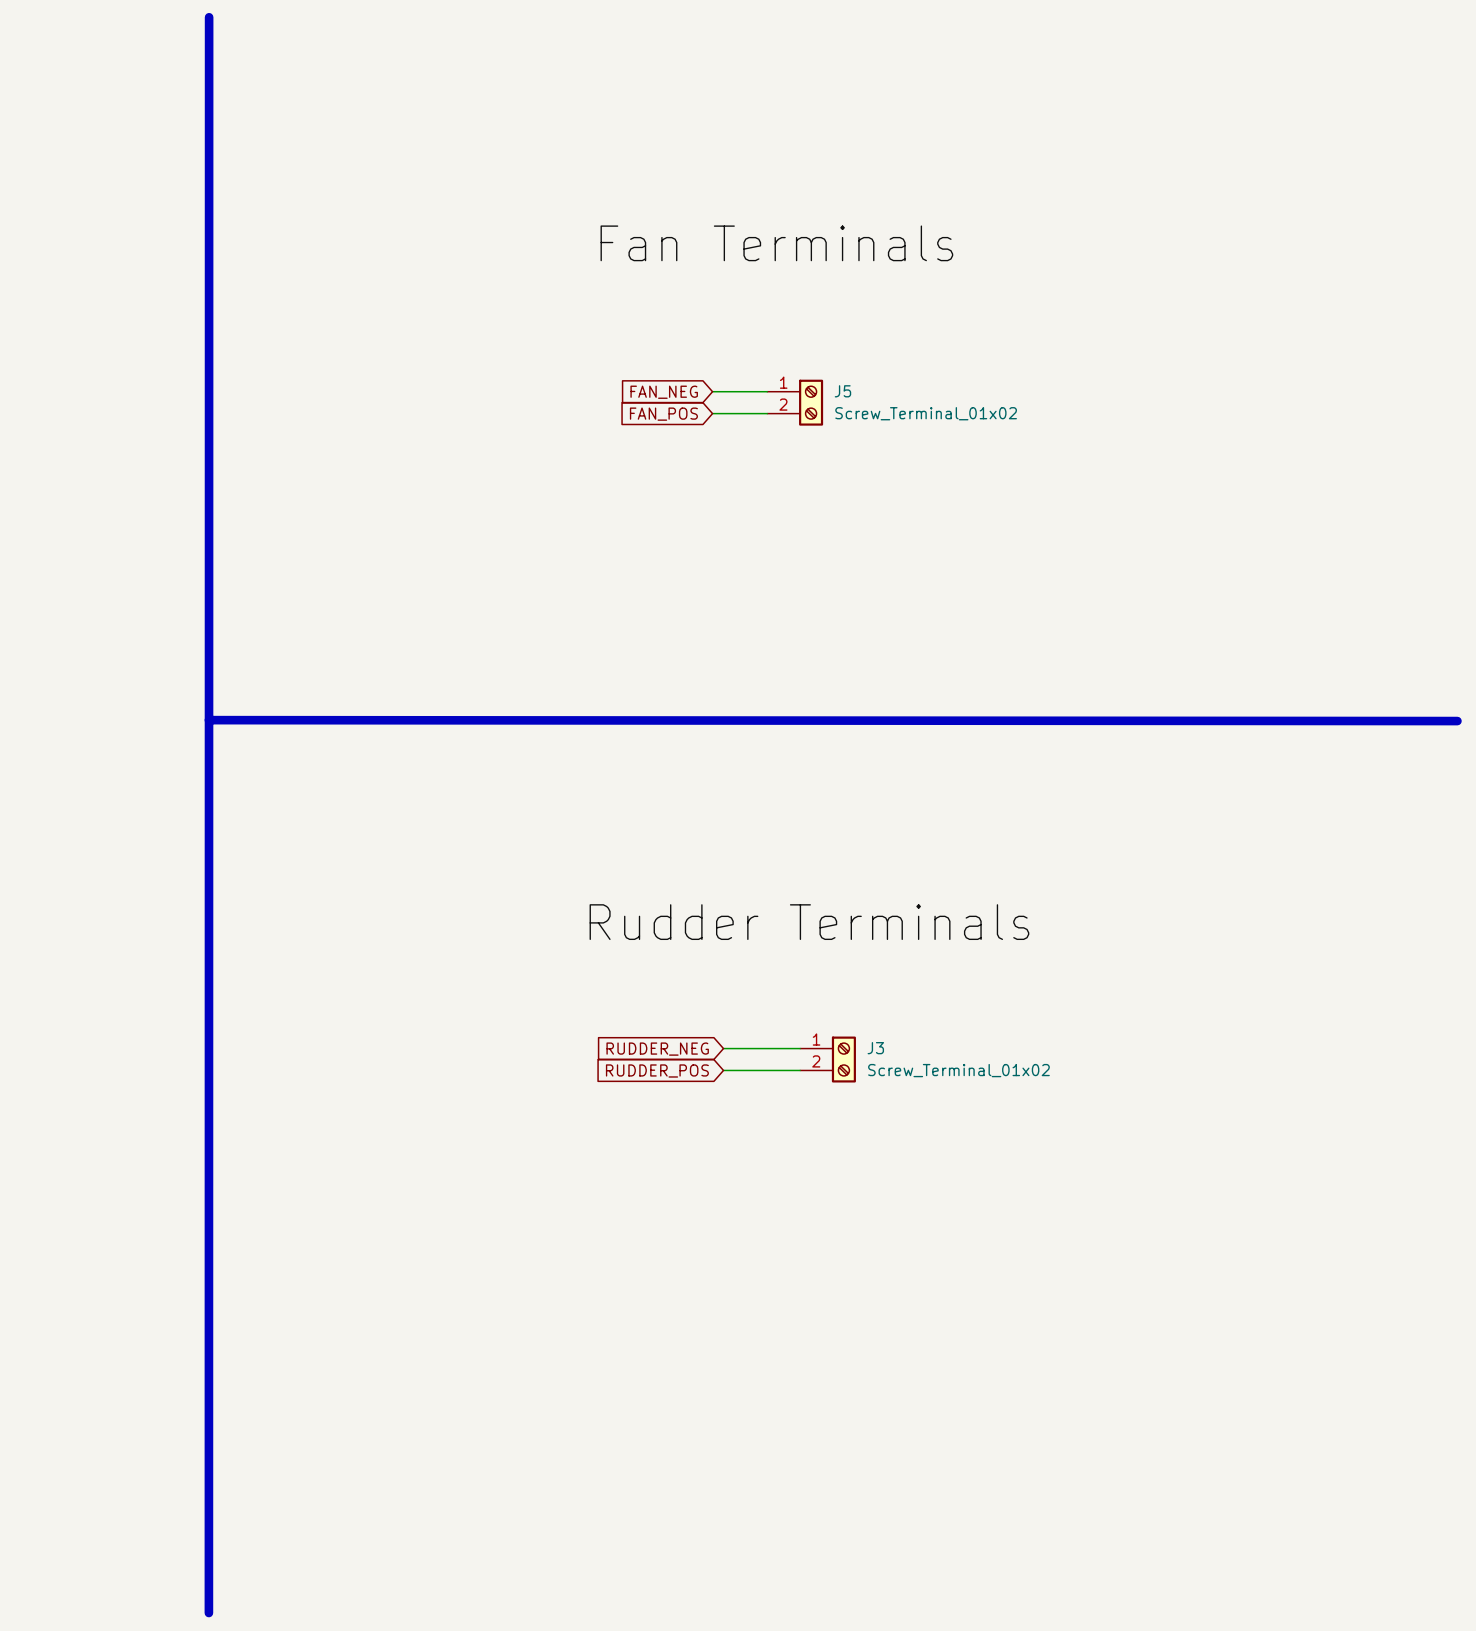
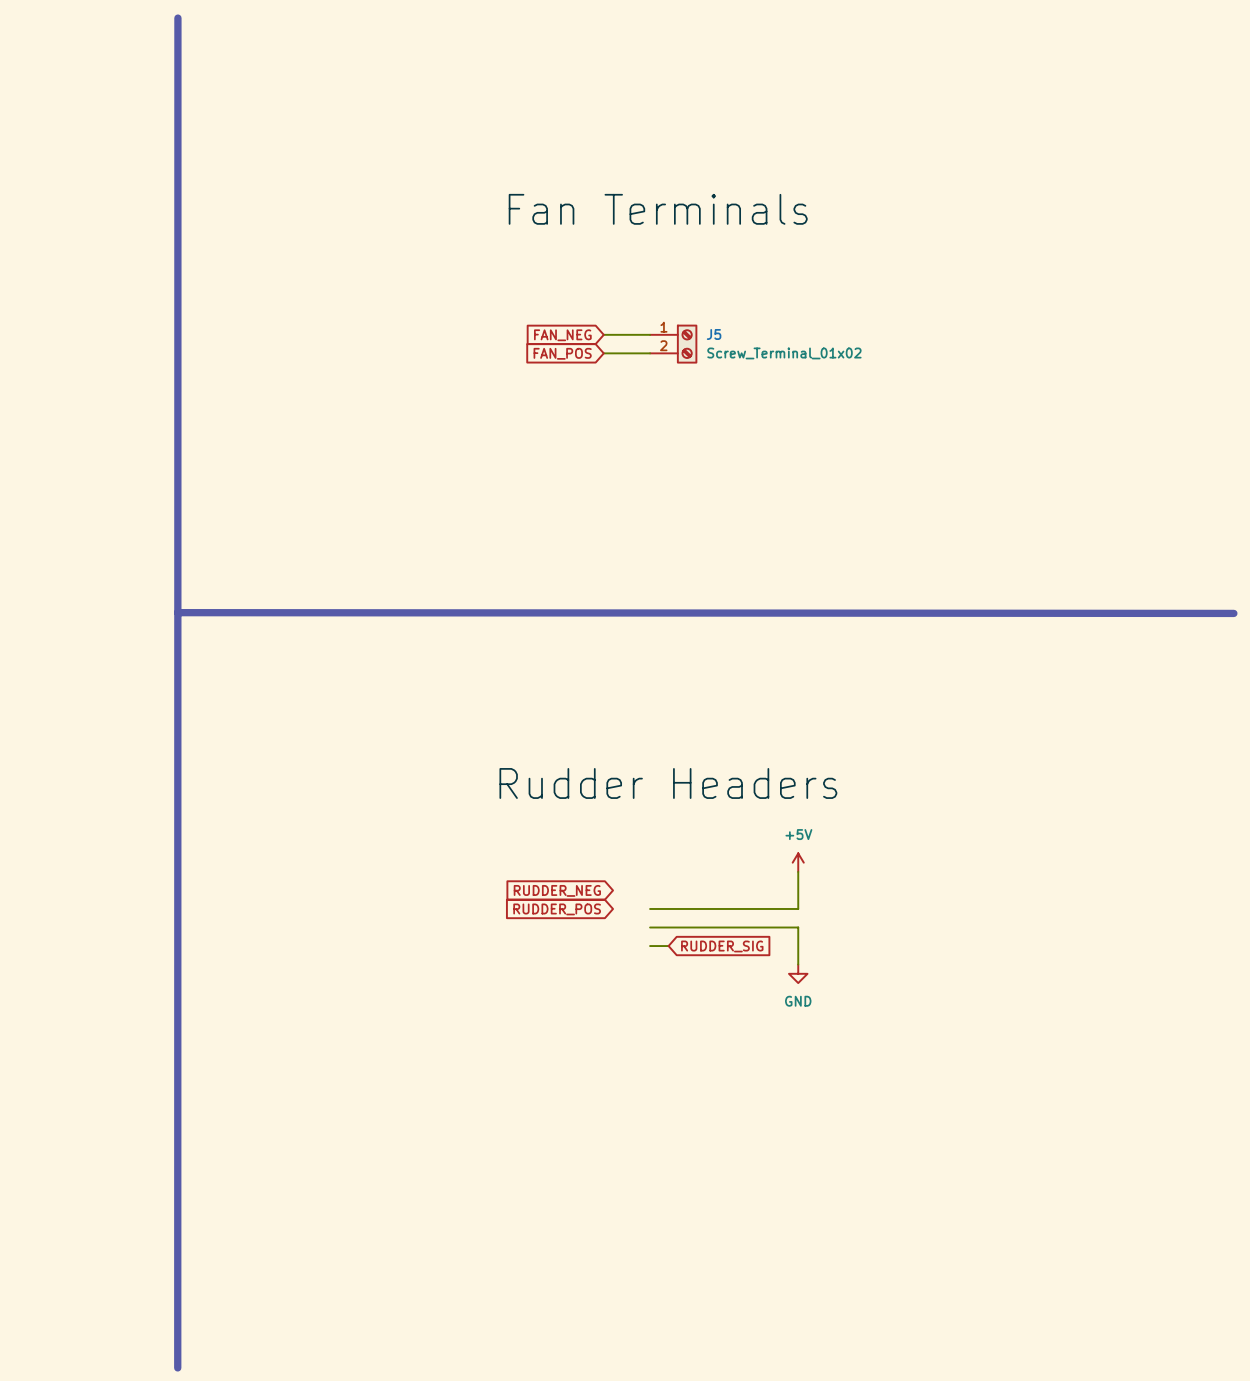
label: Rudder Terminals (809, 922) -> Rudder Headers (668, 783)
power symbol: none -> +5V (798, 862)
wire: none -> (798, 871) (798, 908) (677, 908)
wire: (723, 1048) (800, 1048) -> none
J3: Screw_Terminal_01x02 (828, 1059) -> none
wire: (723, 1070) (767, 1070) -> none
wire: none -> (650, 927) (798, 927) (798, 964)
wire: none -> (650, 946) (668, 946)
global label: none -> RUDDER_SIG (722, 946)
power symbol: none -> GND (798, 973)

